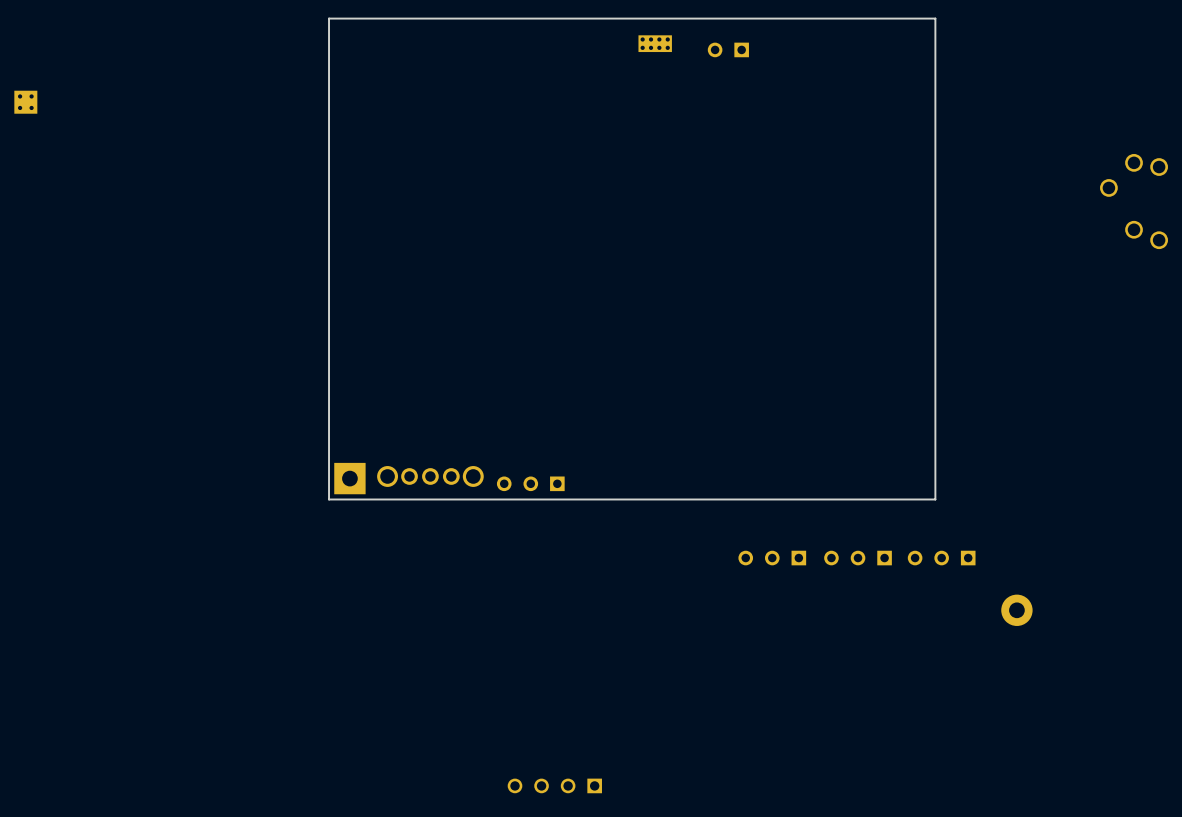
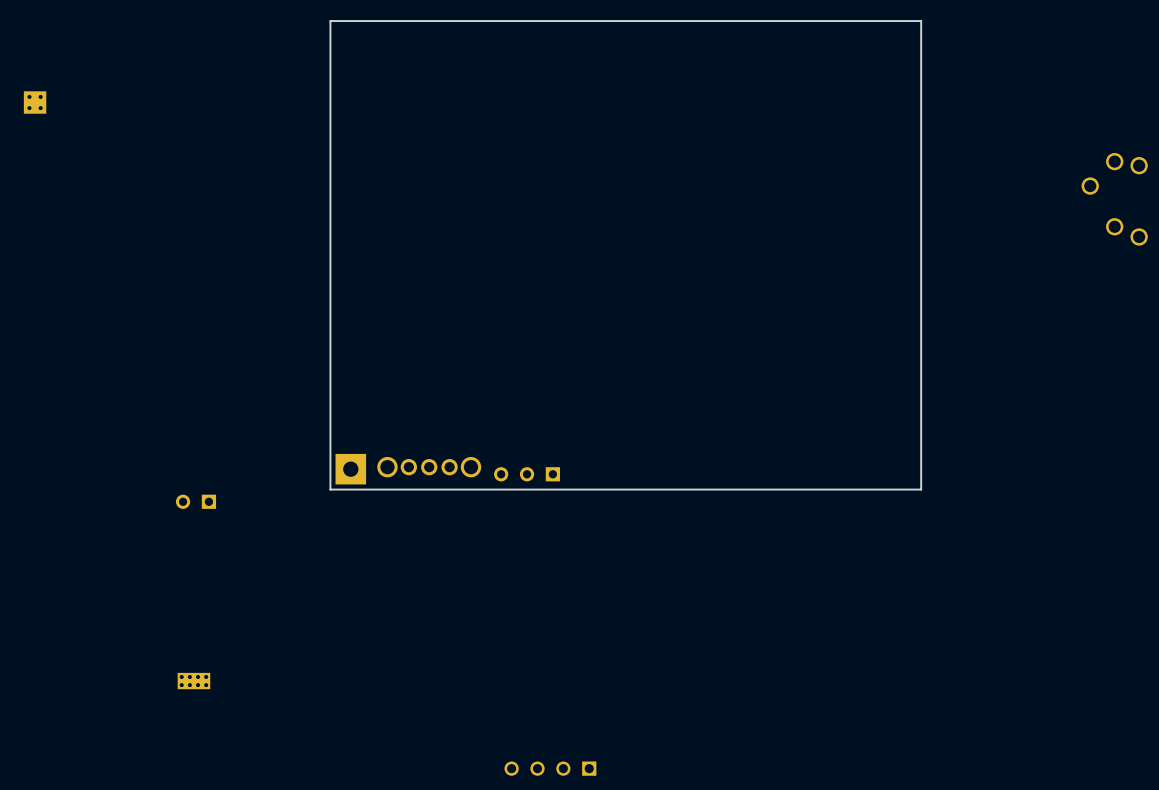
part: (655, 43) -> none
part: (728, 49) -> none
part: none -> (195, 501)
part: (772, 558) -> none
part: (858, 558) -> none
part: (941, 558) -> none
part: (1016, 610) -> none
part: none -> (193, 681)

